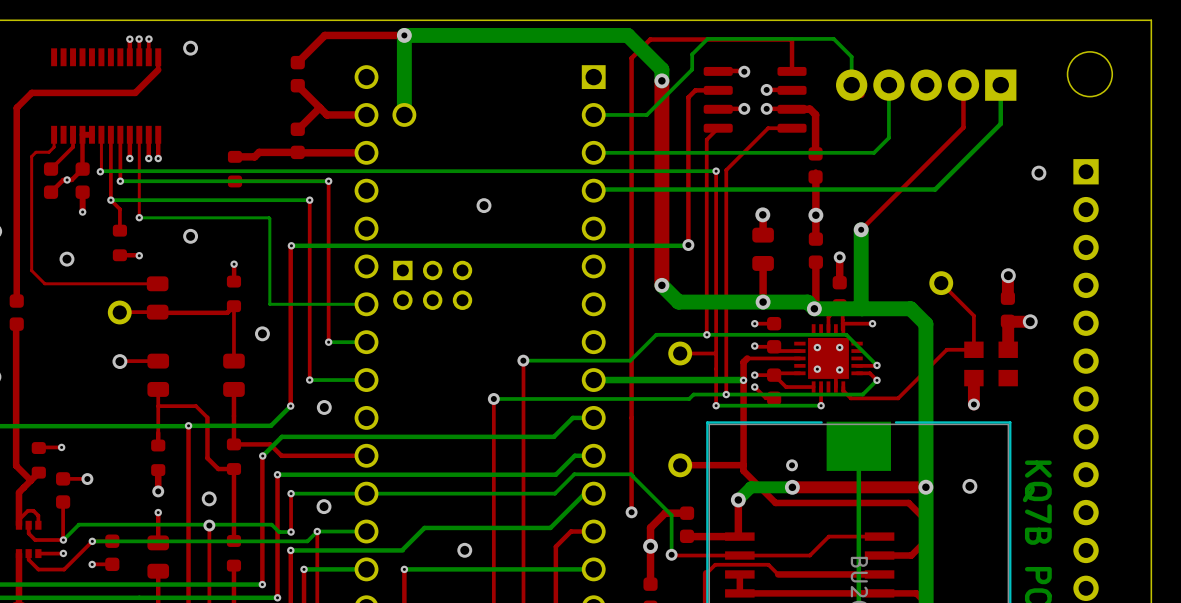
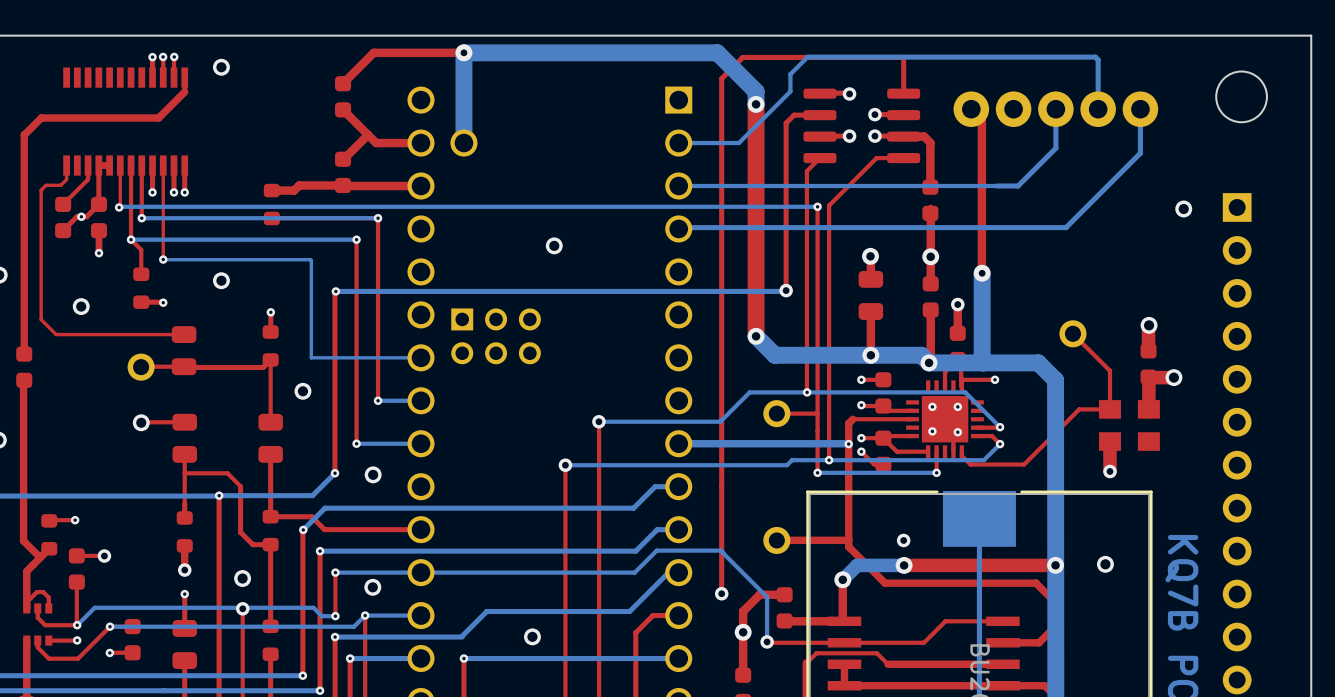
bottom track: (707, 39) (833, 38) (851, 56) (851, 85) -> (807, 57) (1095, 57) (1098, 59) (1098, 109)
part footprint: [836, 69, 1017, 101] -> [953, 91, 1159, 127]
bottom track: (888, 85) (888, 137) (874, 152) -> (1055, 109) (1055, 148) (1018, 185) (996, 185)
top track: (963, 85) (963, 127) (861, 229) -> (981, 119) (981, 273)

